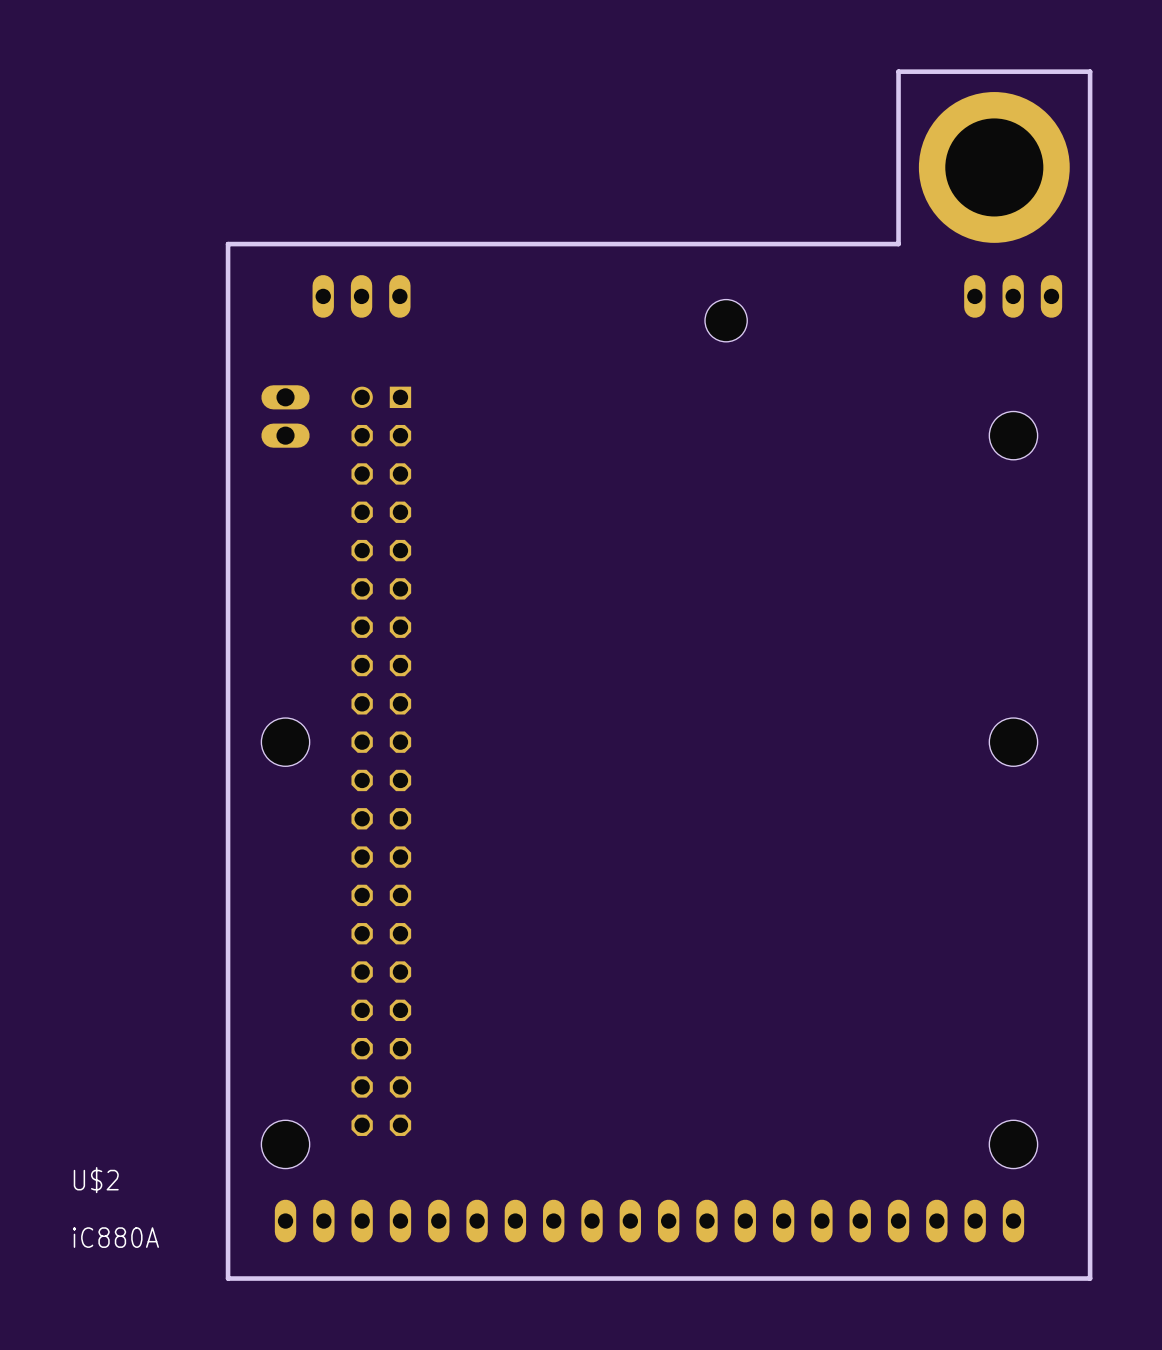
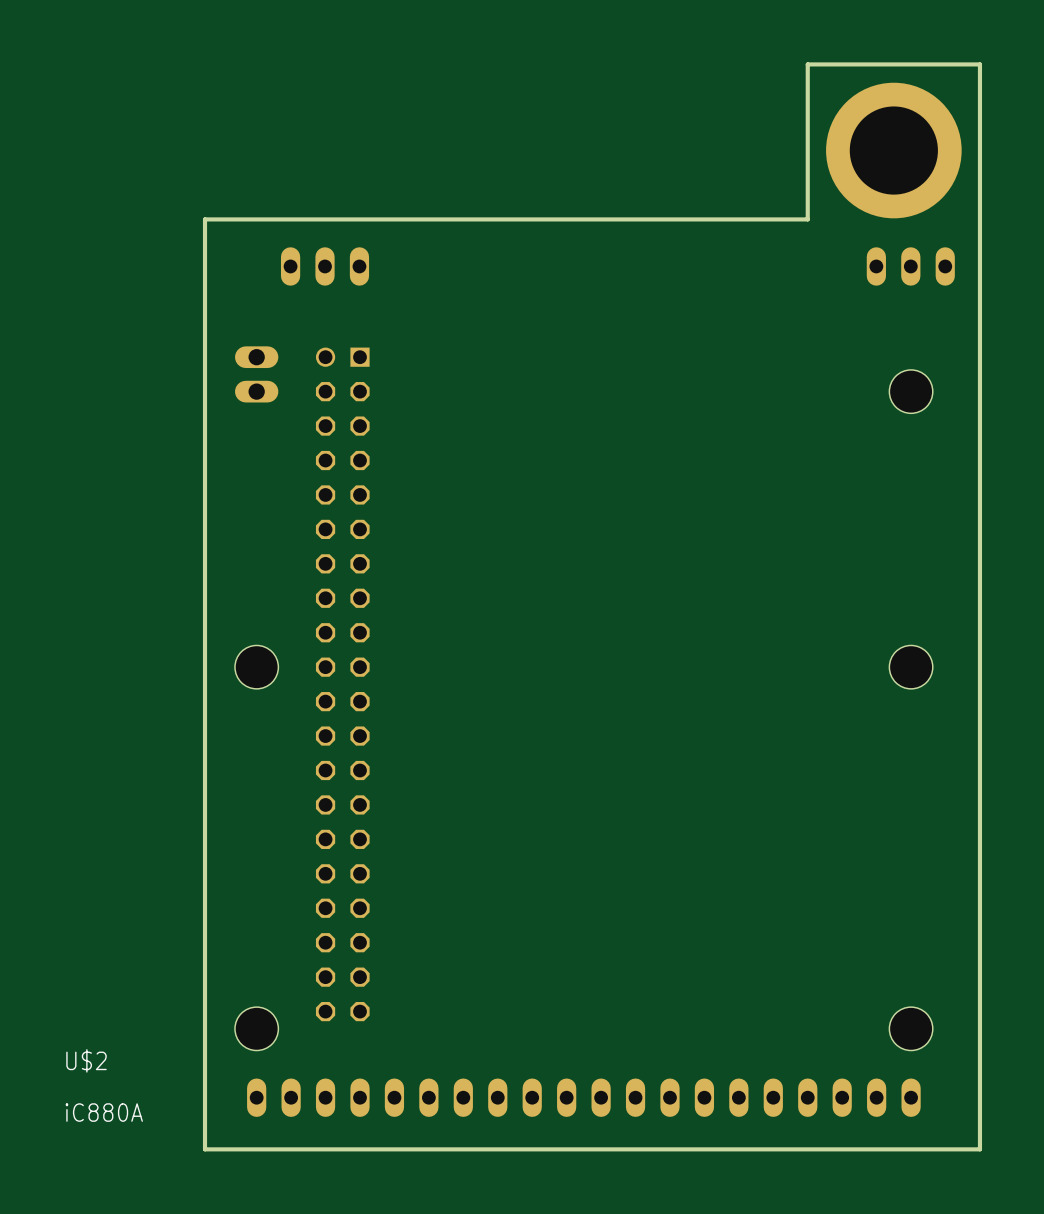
hole: (726, 320) -> none

